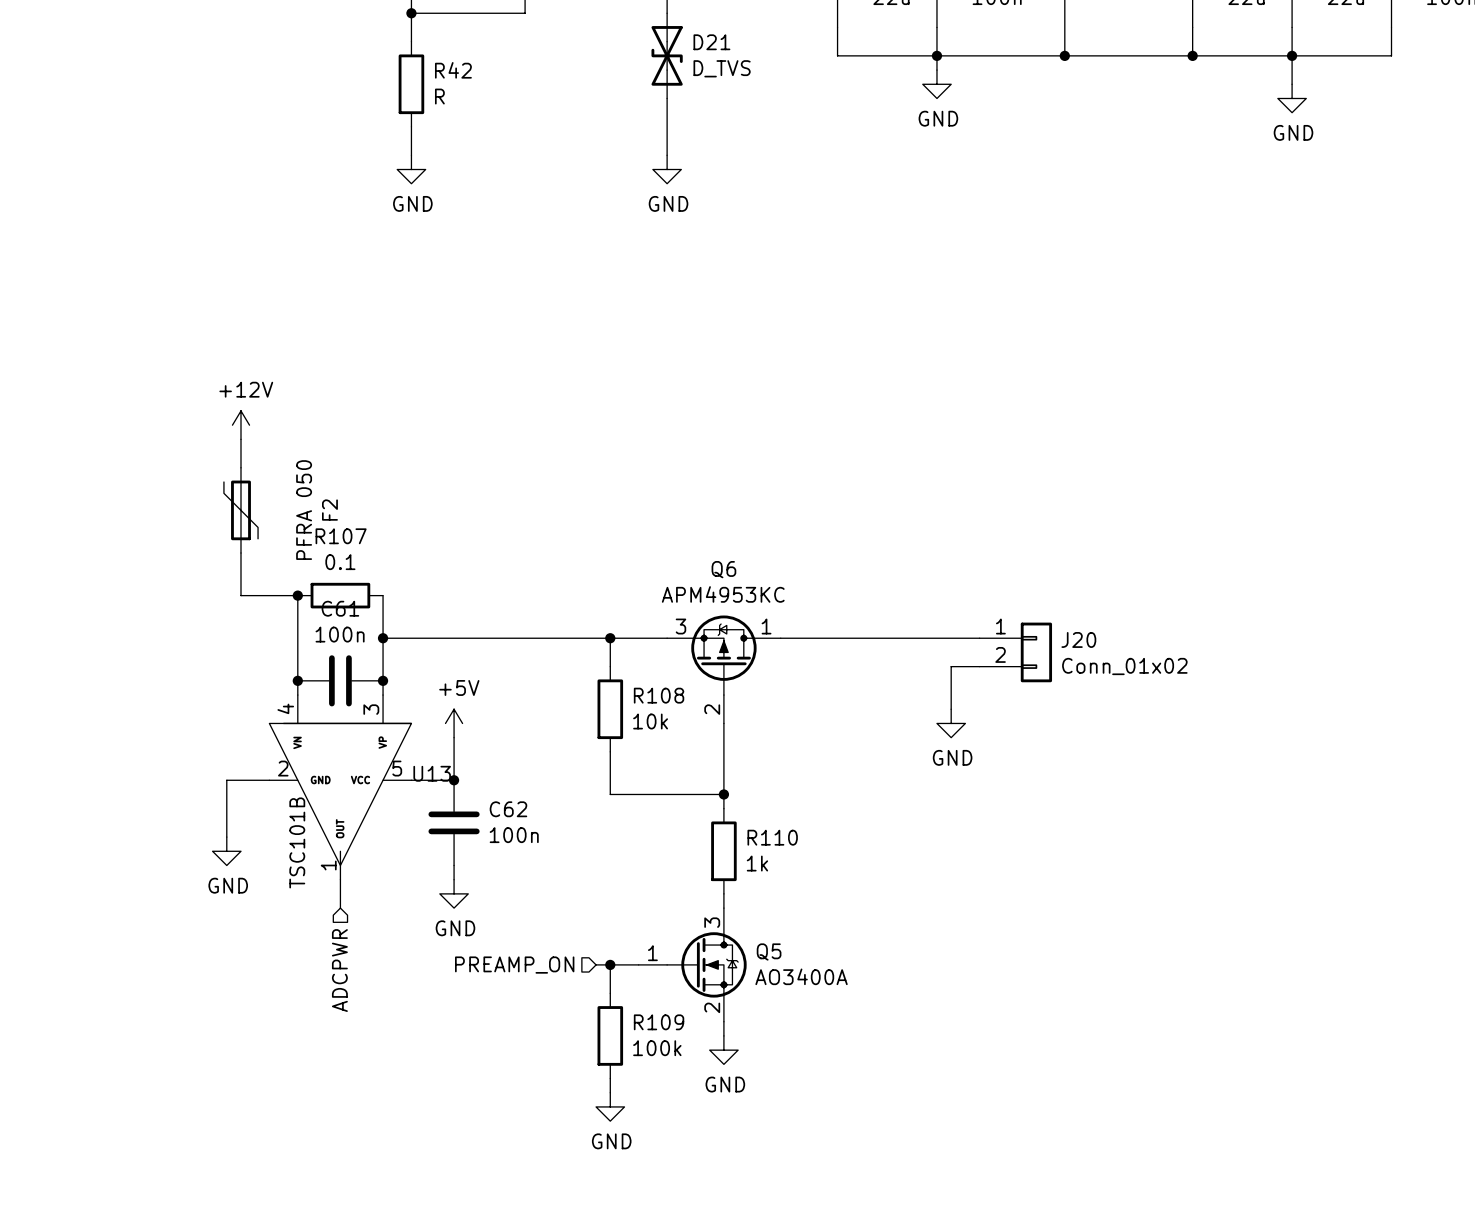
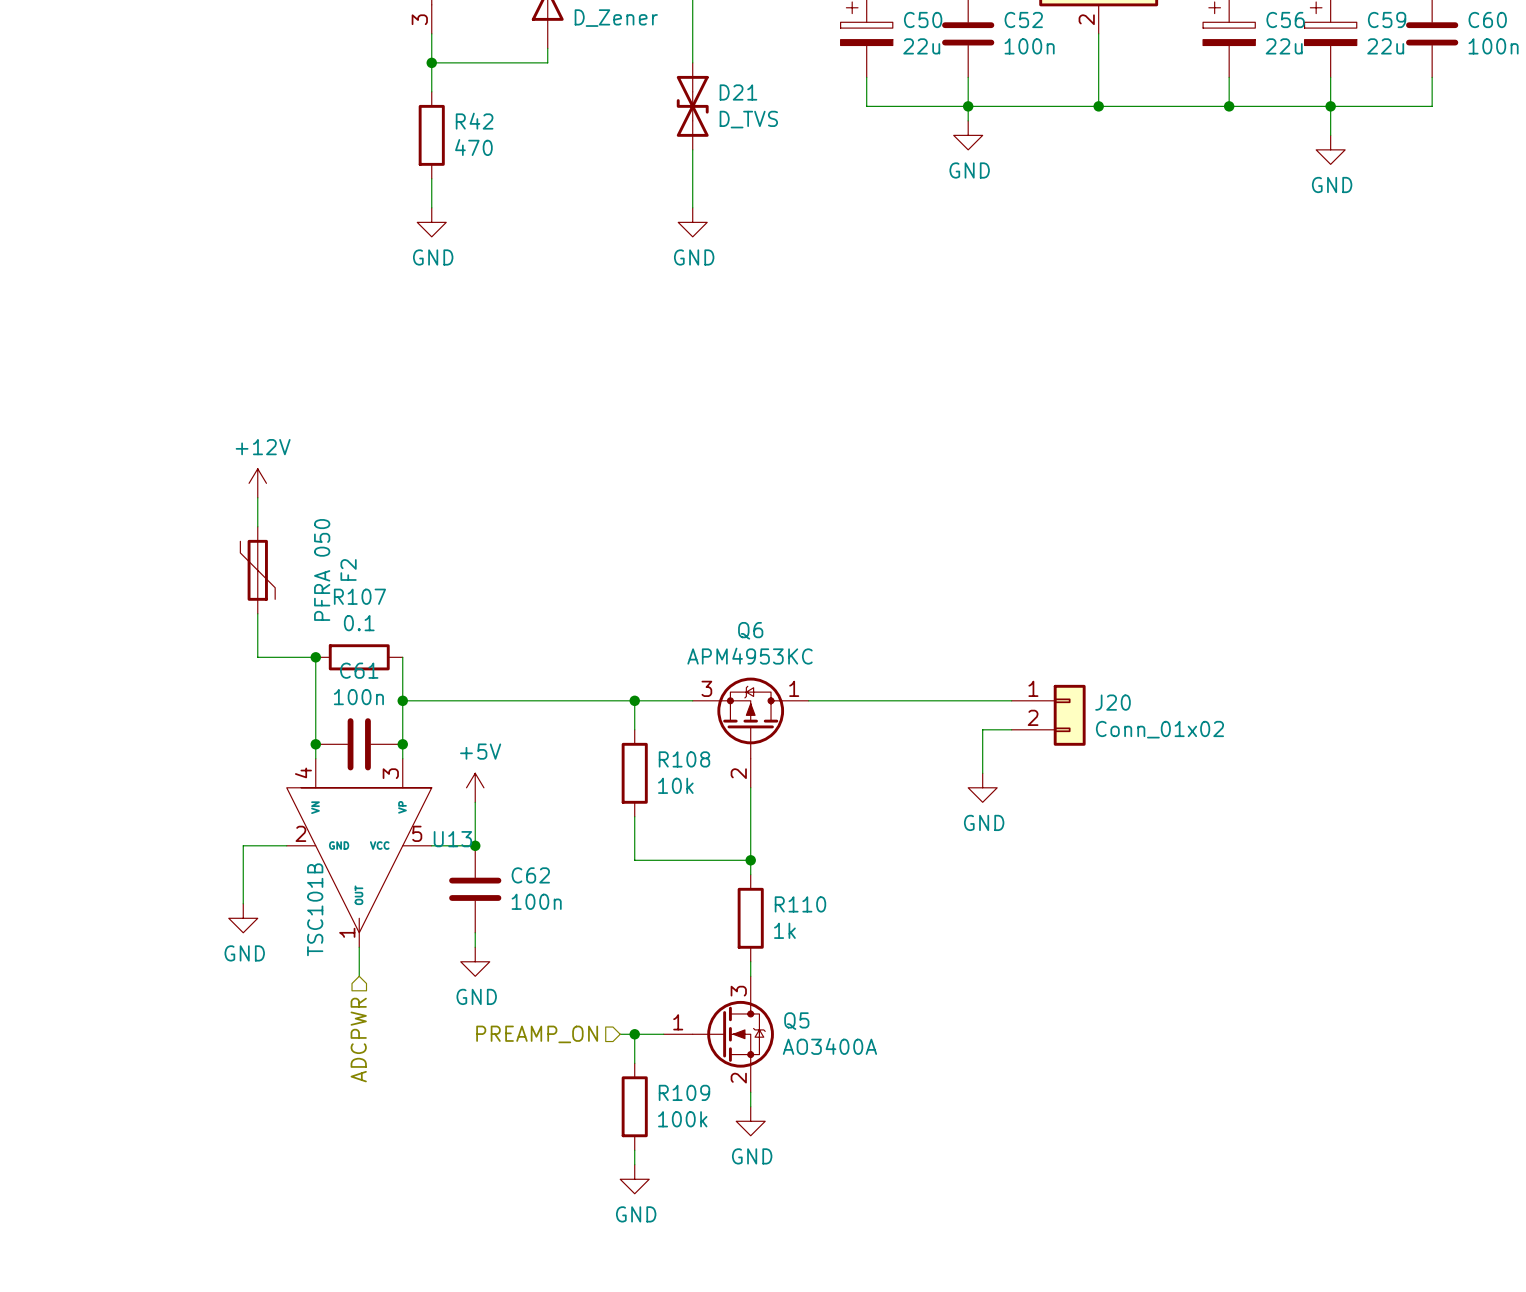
R42 value: R (439, 96) -> 470 (473, 147)

